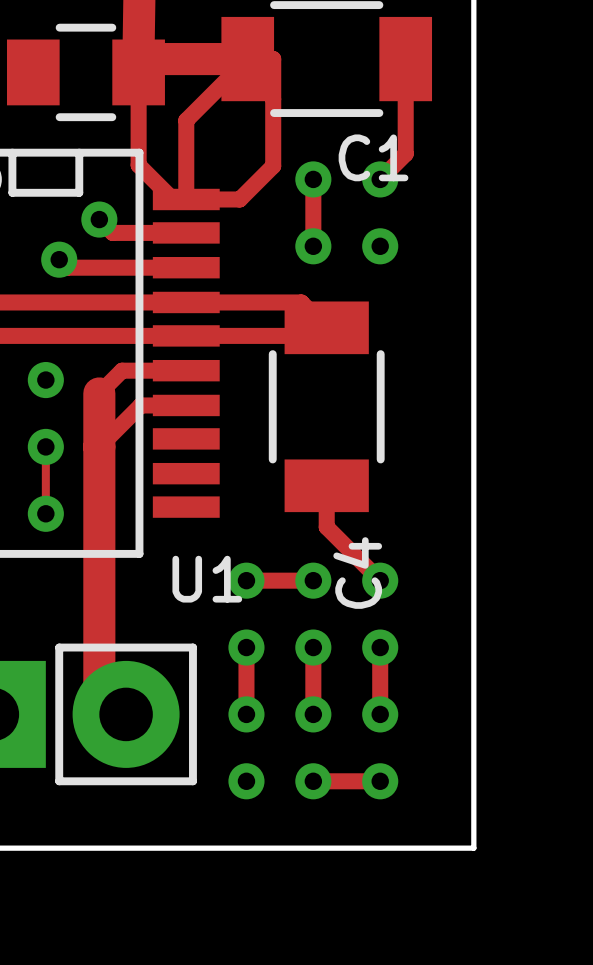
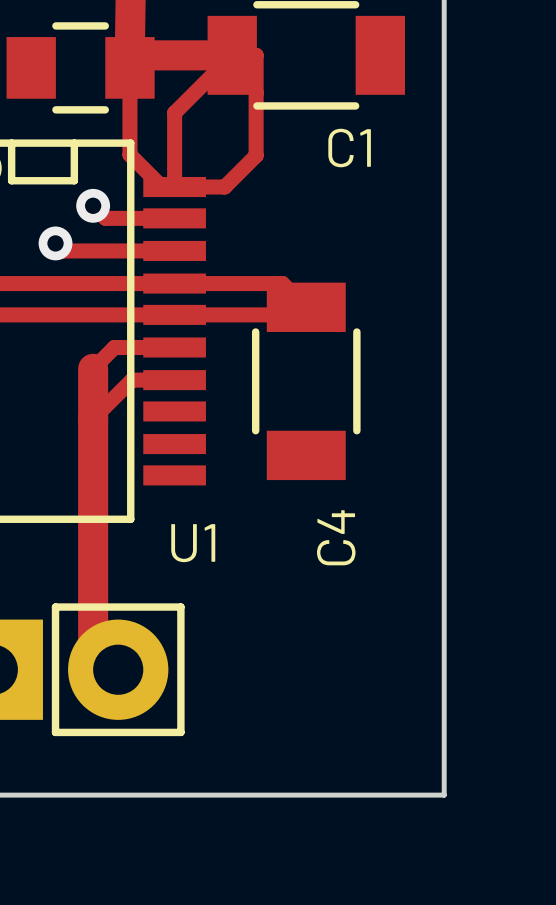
track: (405, 59) (405, 153) (380, 179) -> none
track: (313, 179) (313, 246) -> none
via: (313, 179) -> none
via: (380, 179) -> none
via: (313, 246) -> none
via: (380, 246) -> none
via: (45, 380) -> none
track: (45, 446) (45, 513) -> none
via: (45, 446) -> none
track: (326, 485) (326, 527) (380, 580) -> none
via: (45, 513) -> none
track: (246, 580) (313, 580) -> none
via: (246, 580) -> none
via: (313, 580) -> none
via: (380, 580) -> none
track: (246, 647) (246, 714) -> none
via: (246, 647) -> none
track: (313, 647) (313, 714) -> none
via: (313, 647) -> none
track: (380, 647) (380, 714) -> none
via: (380, 647) -> none
via: (246, 714) -> none
via: (313, 714) -> none
via: (380, 714) -> none
via: (246, 781) -> none
track: (313, 781) (380, 781) -> none
via: (313, 781) -> none
via: (380, 781) -> none

